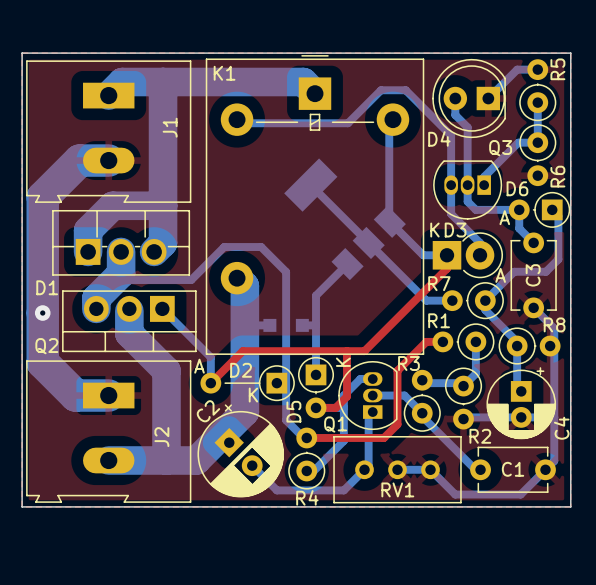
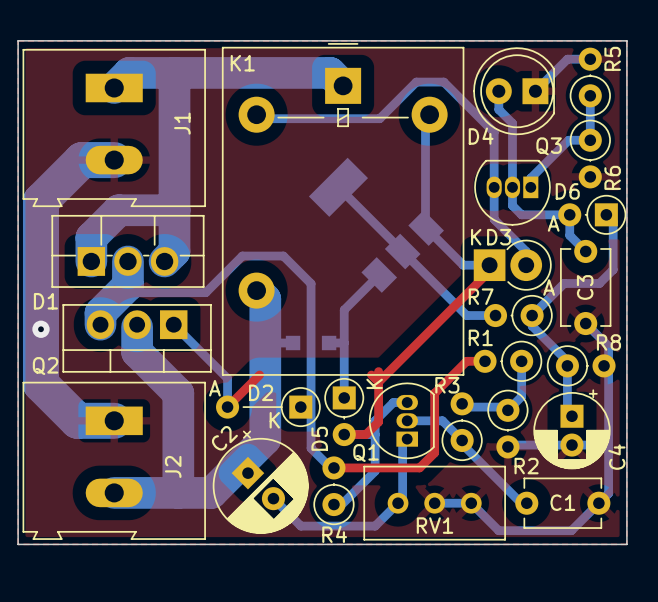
top track: (447, 260) (447, 268) (364, 351) (242, 351) (239, 354) -> (489, 271) (378, 382) (371, 375)

